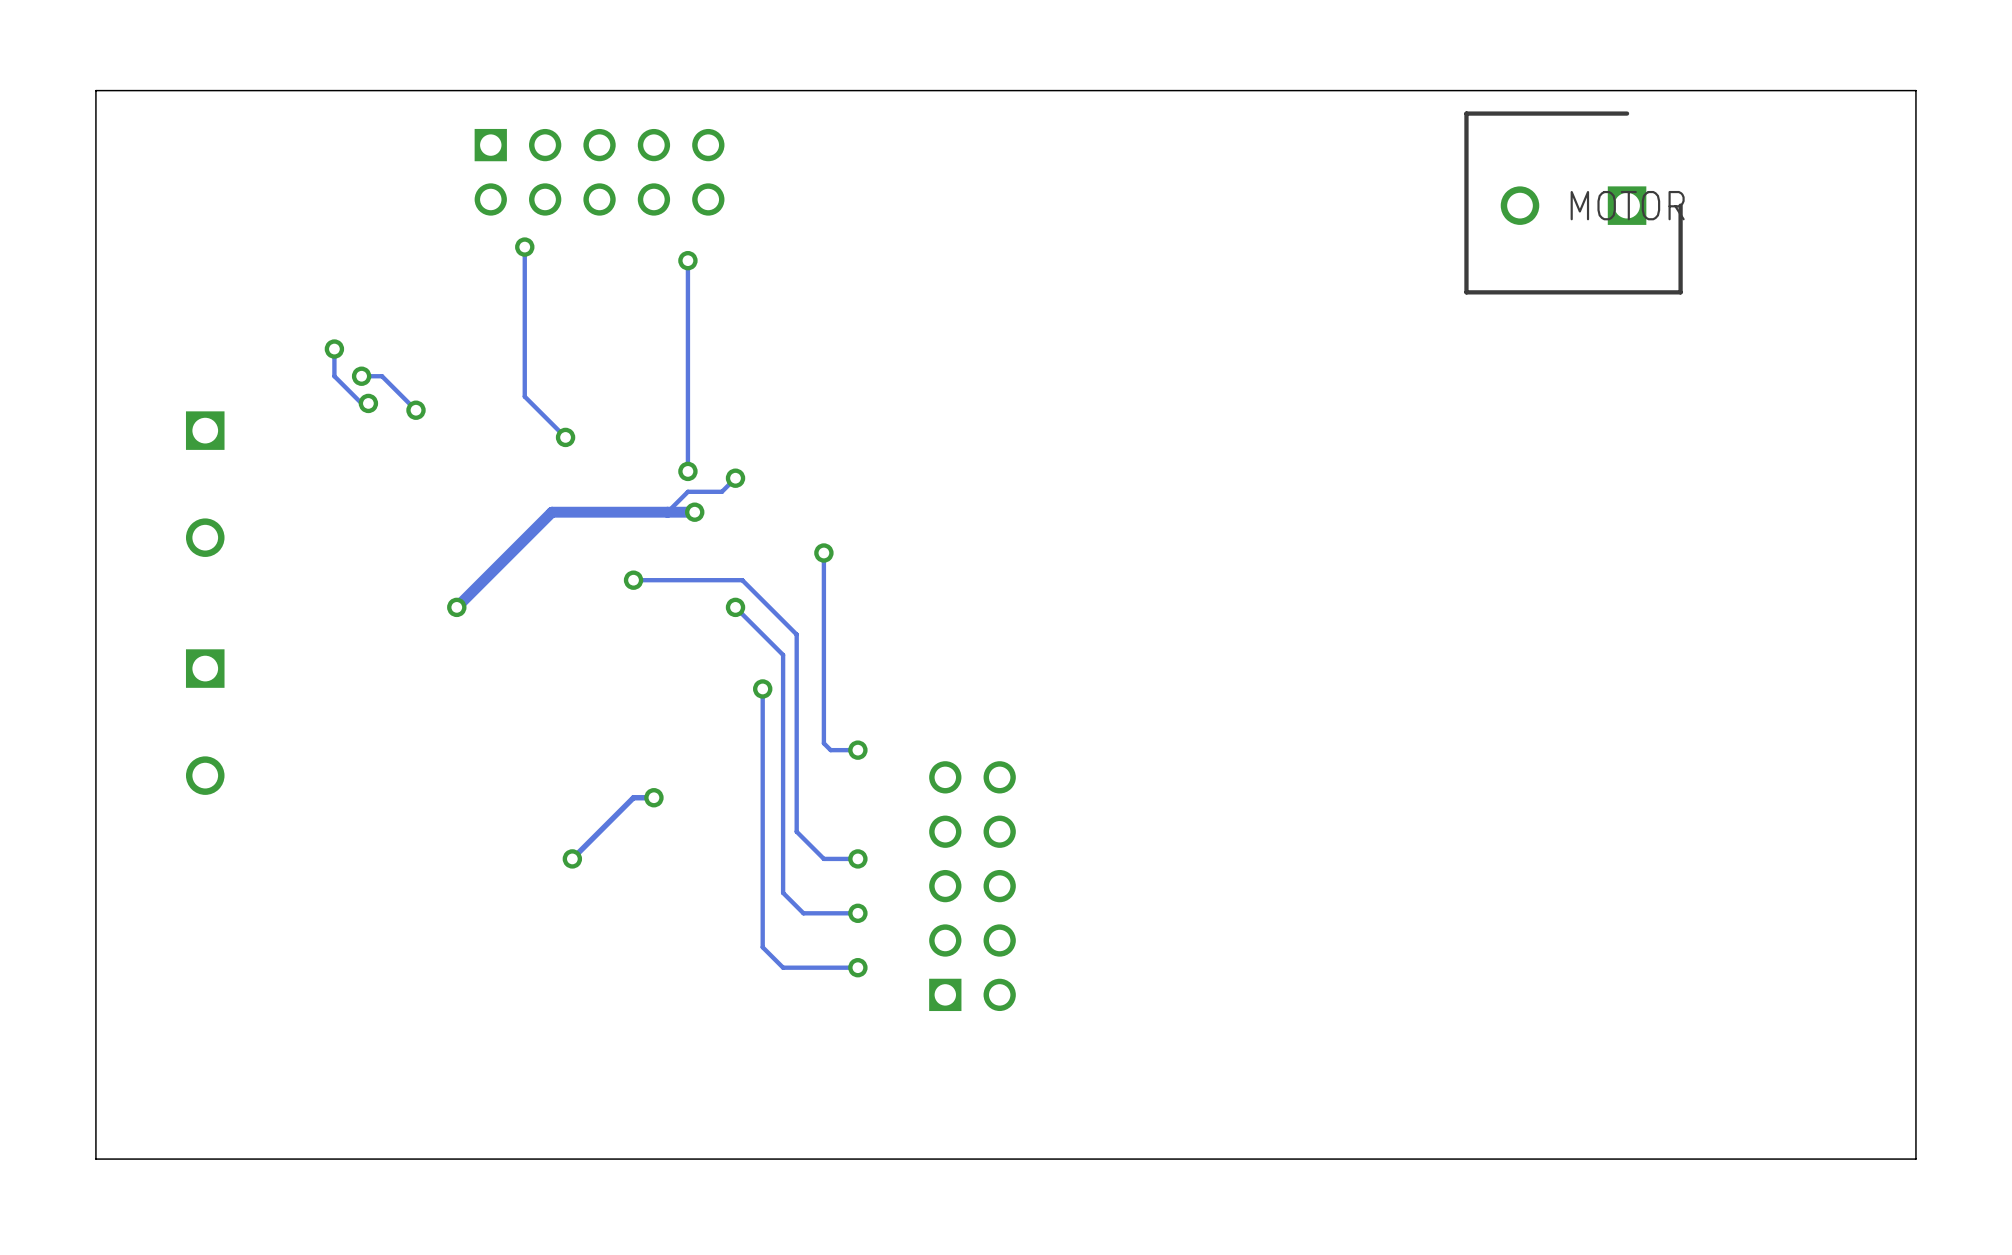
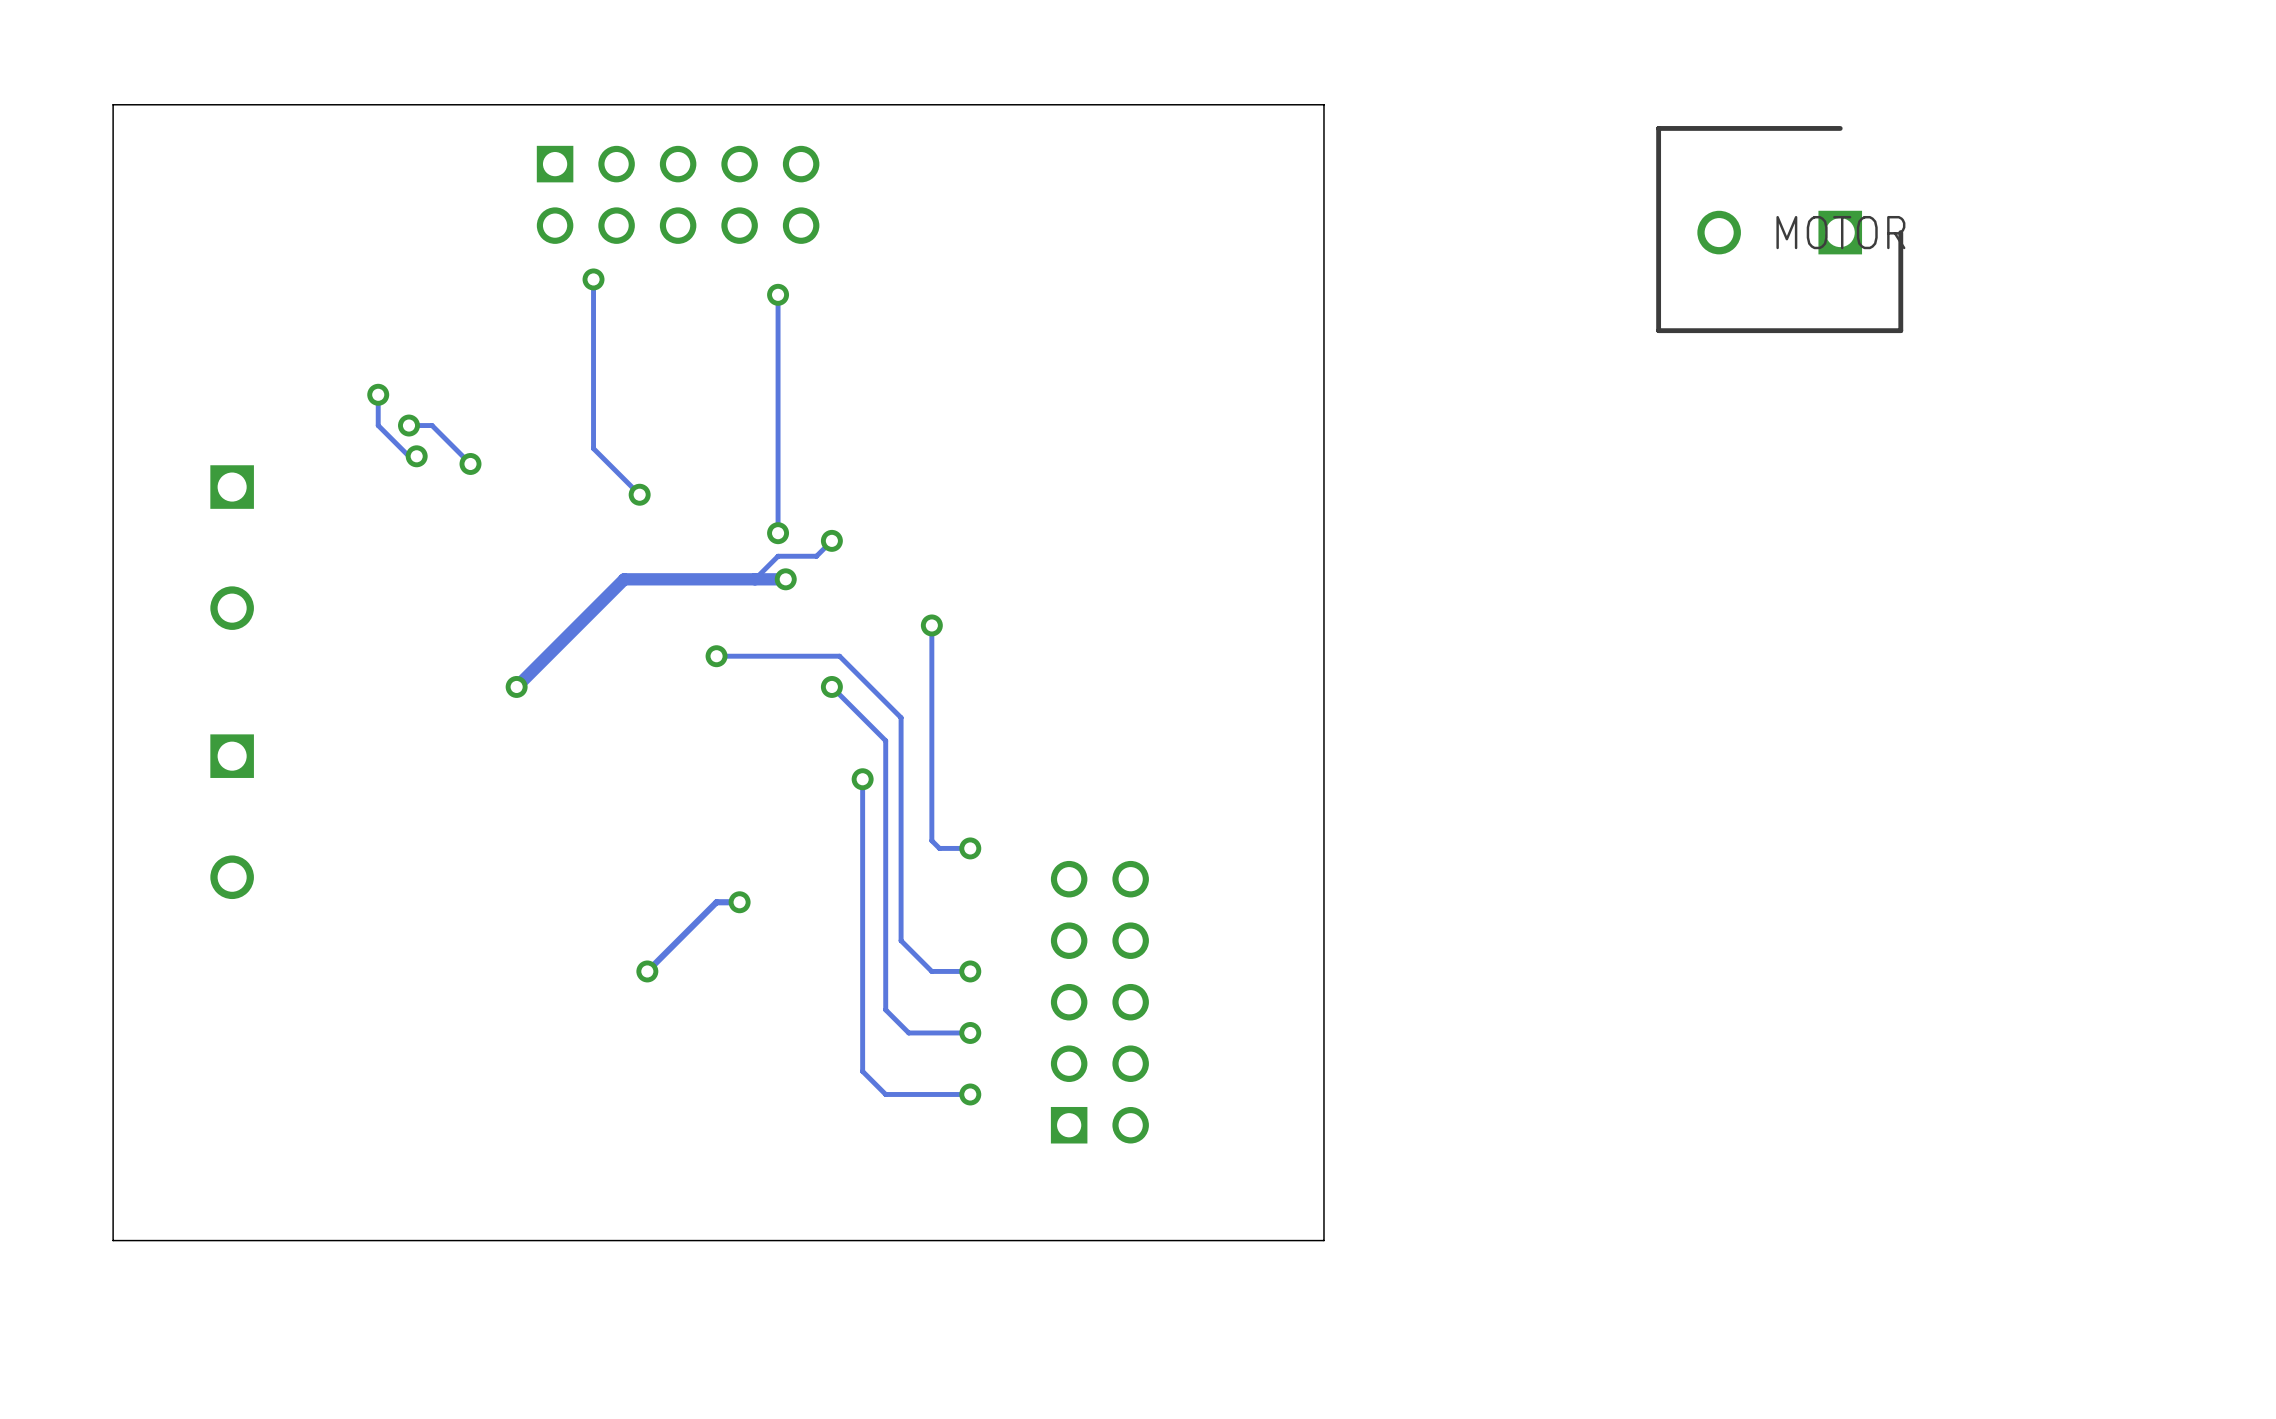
board edge: (1915, 90) (95, 90) (95, 1159) (1915, 1159) (1915, 90) -> (1323, 104) (1323, 1240) (113, 1240) (113, 104) (1323, 104)

